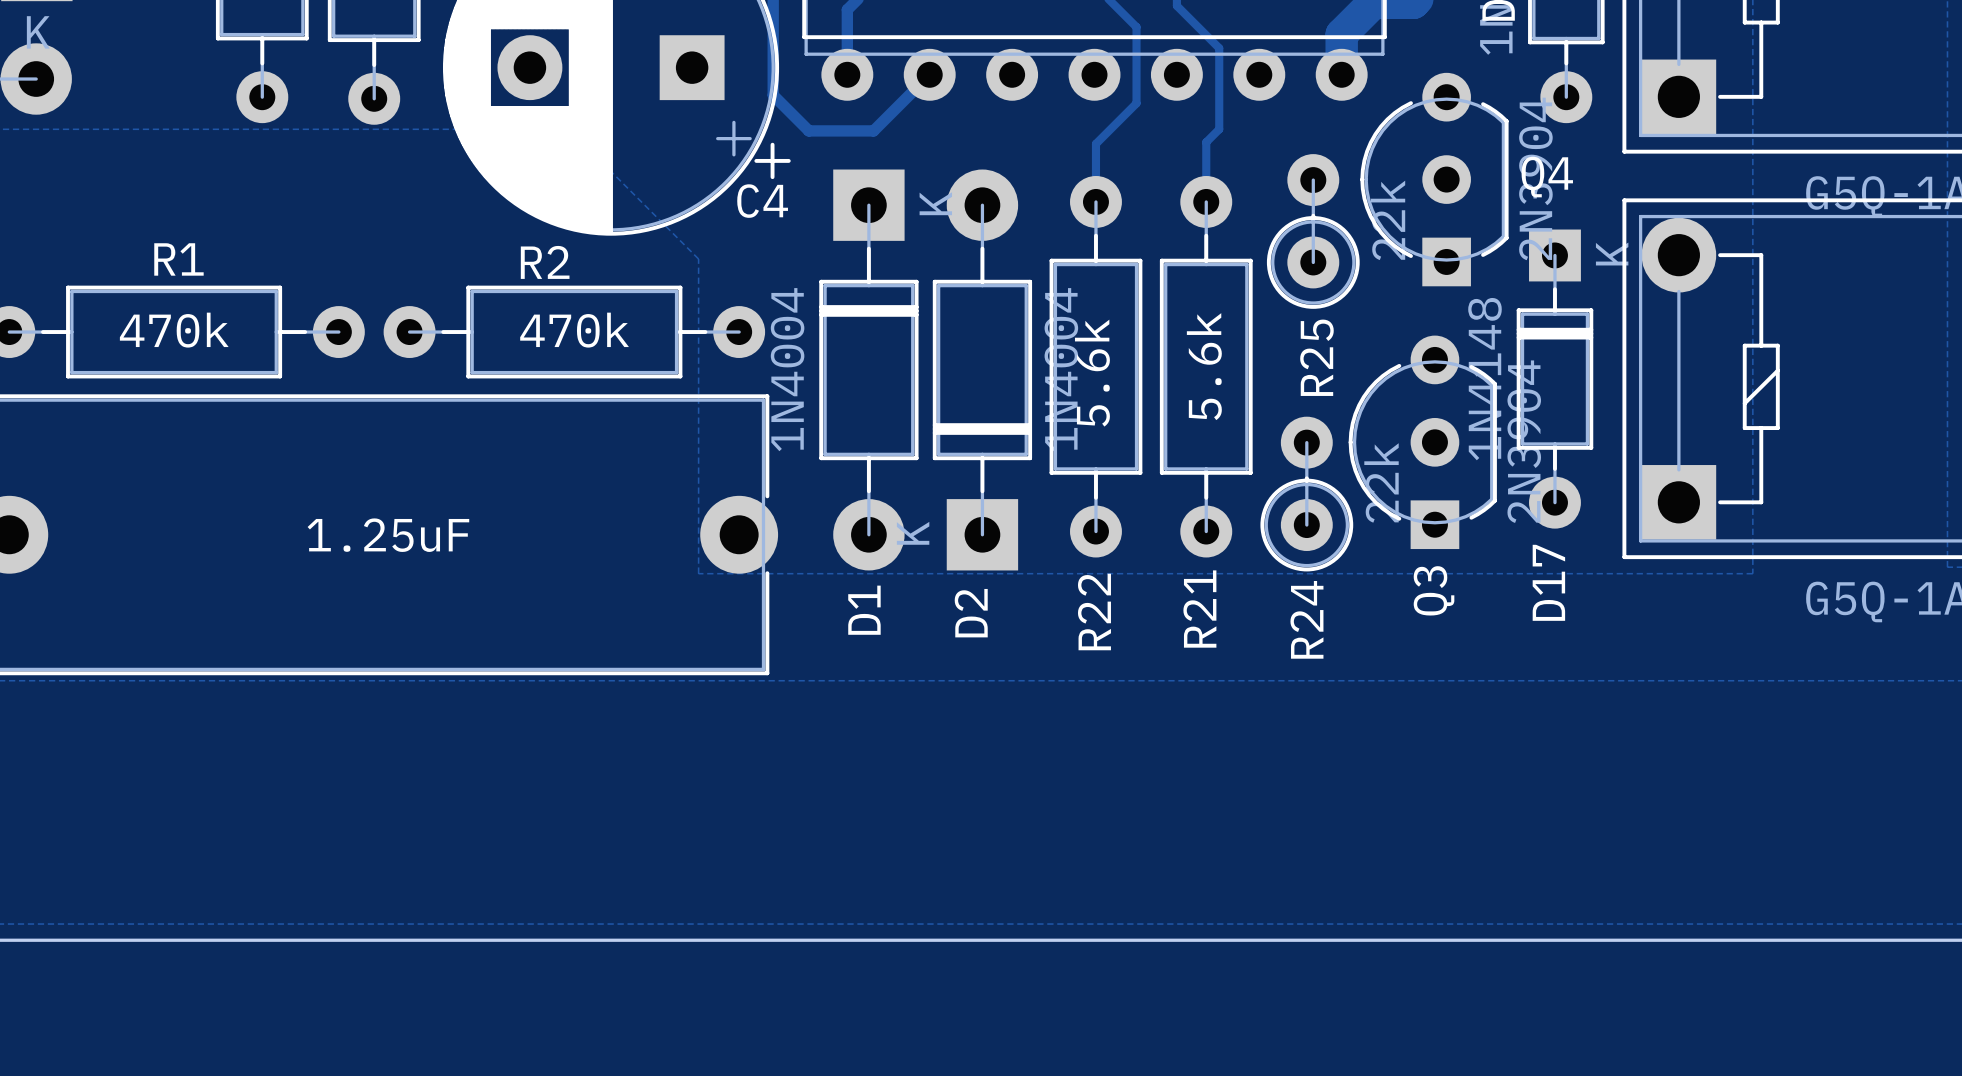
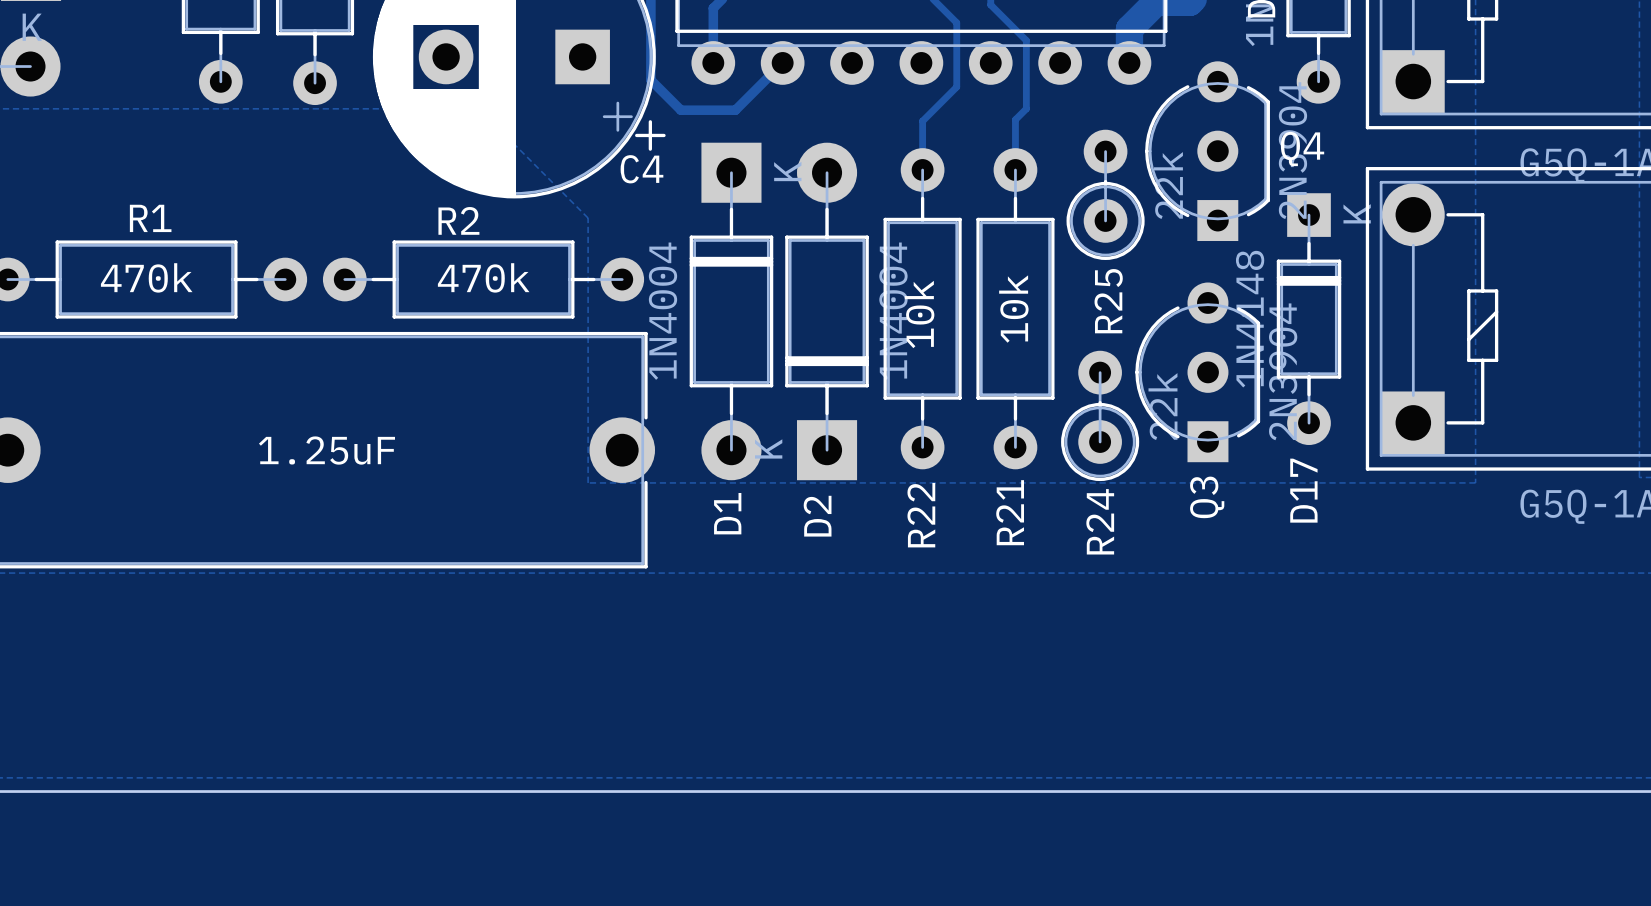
R21 value: 5.6k (1204, 366) -> 10k (1013, 309)
R22 value: 5.6k (1092, 373) -> 10k (919, 314)

